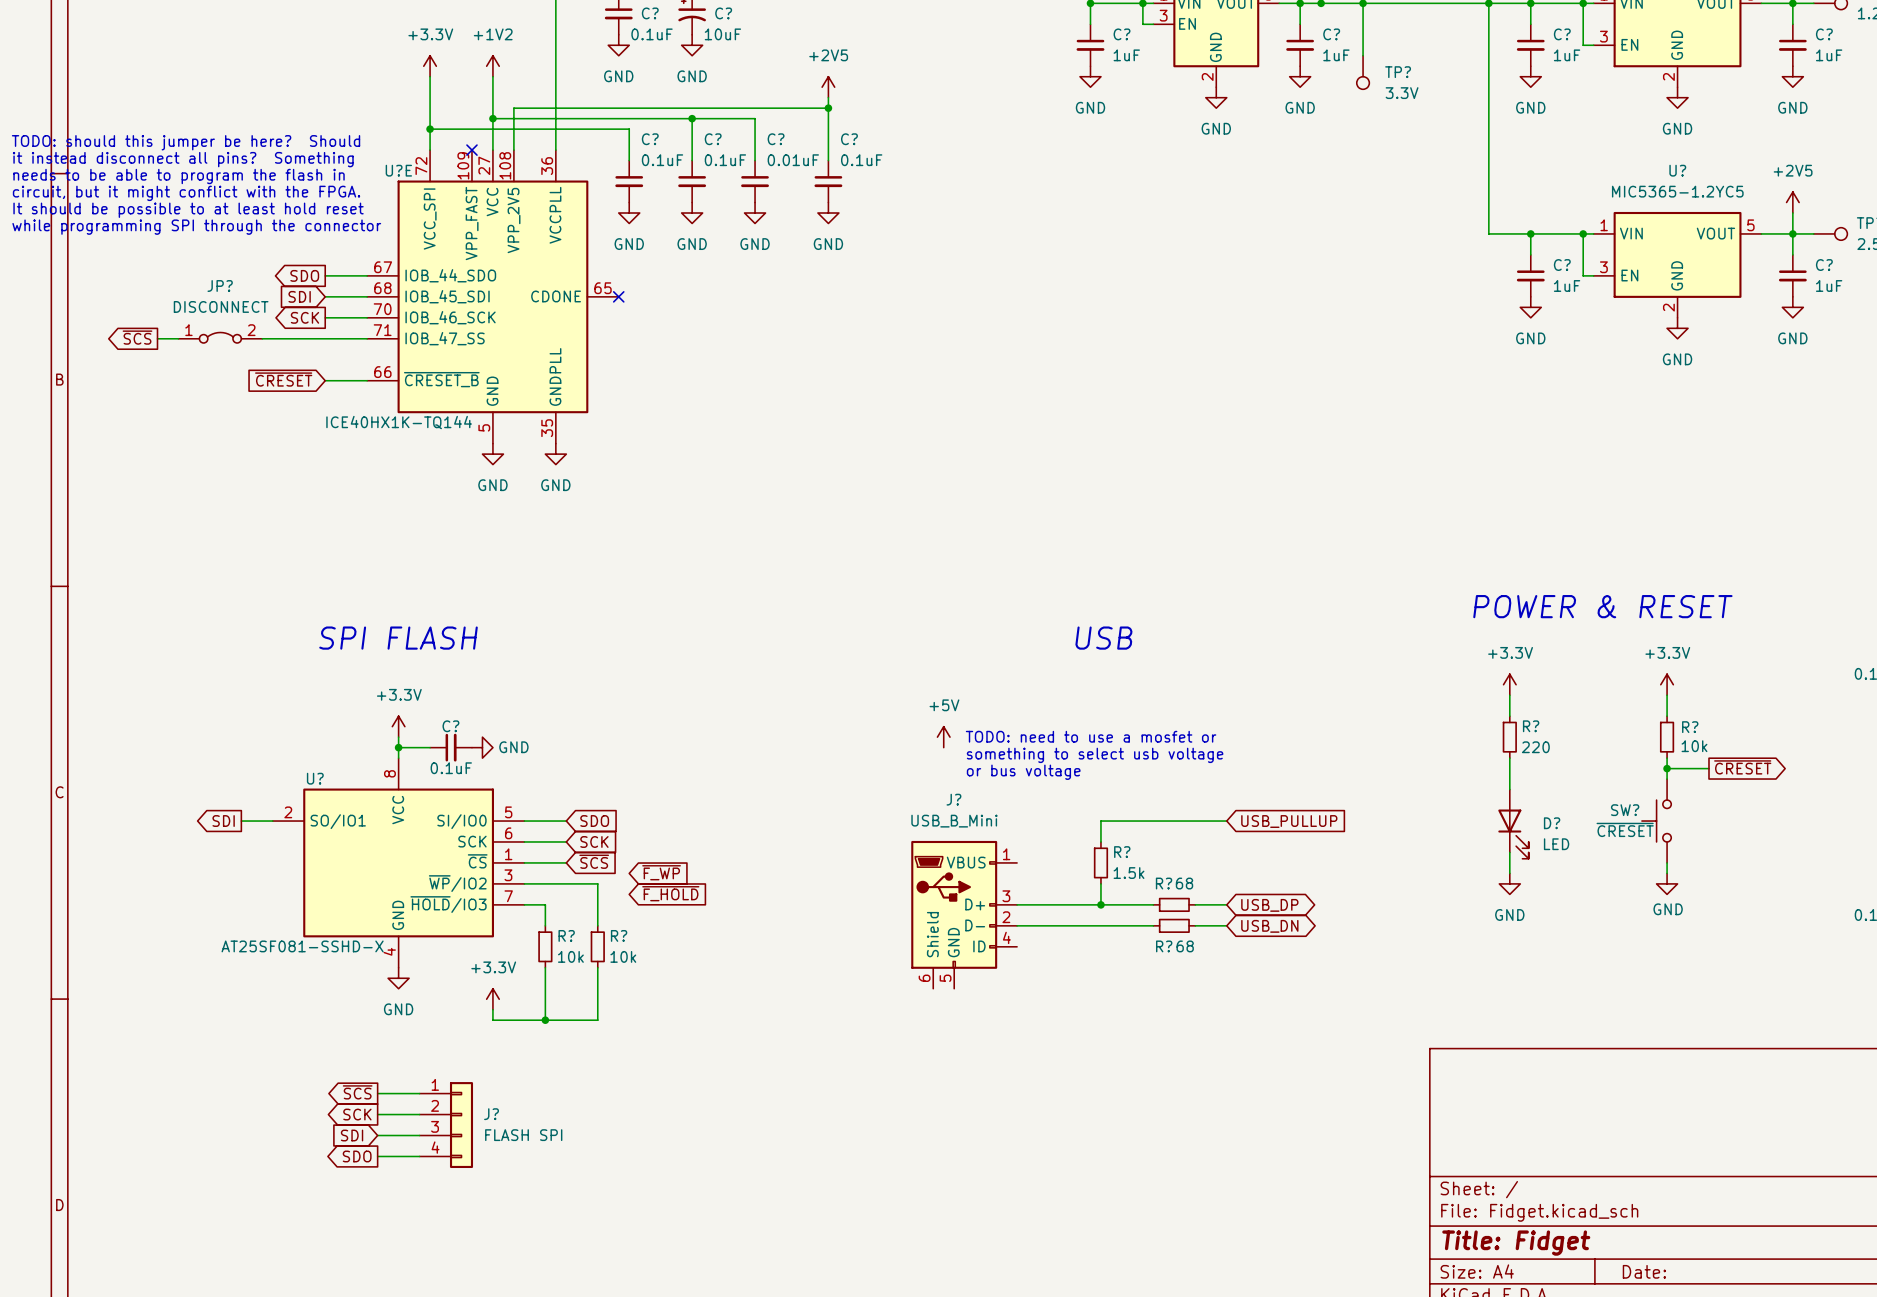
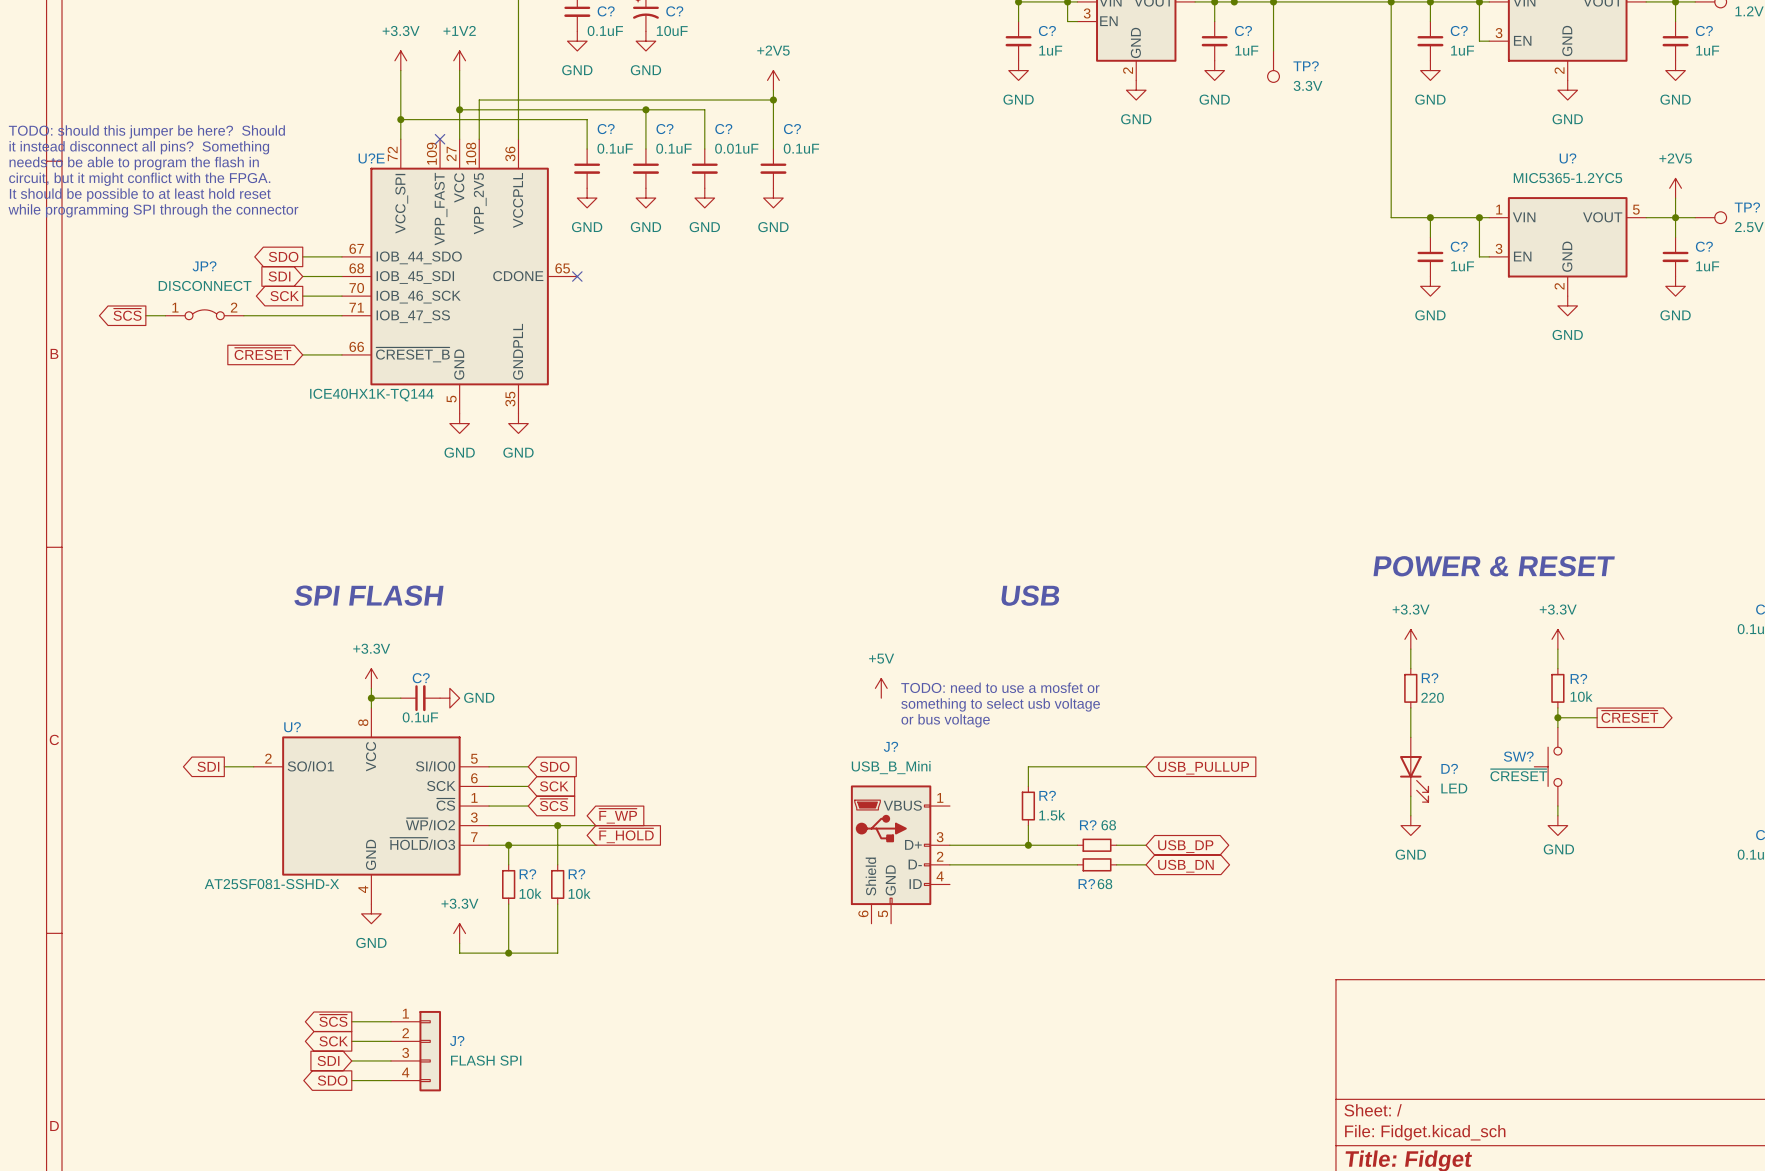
wire: none -> (557, 825) (596, 825)
junction: none -> (557, 825)
wire: none -> (508, 845) (596, 845)
junction: none -> (508, 845)

